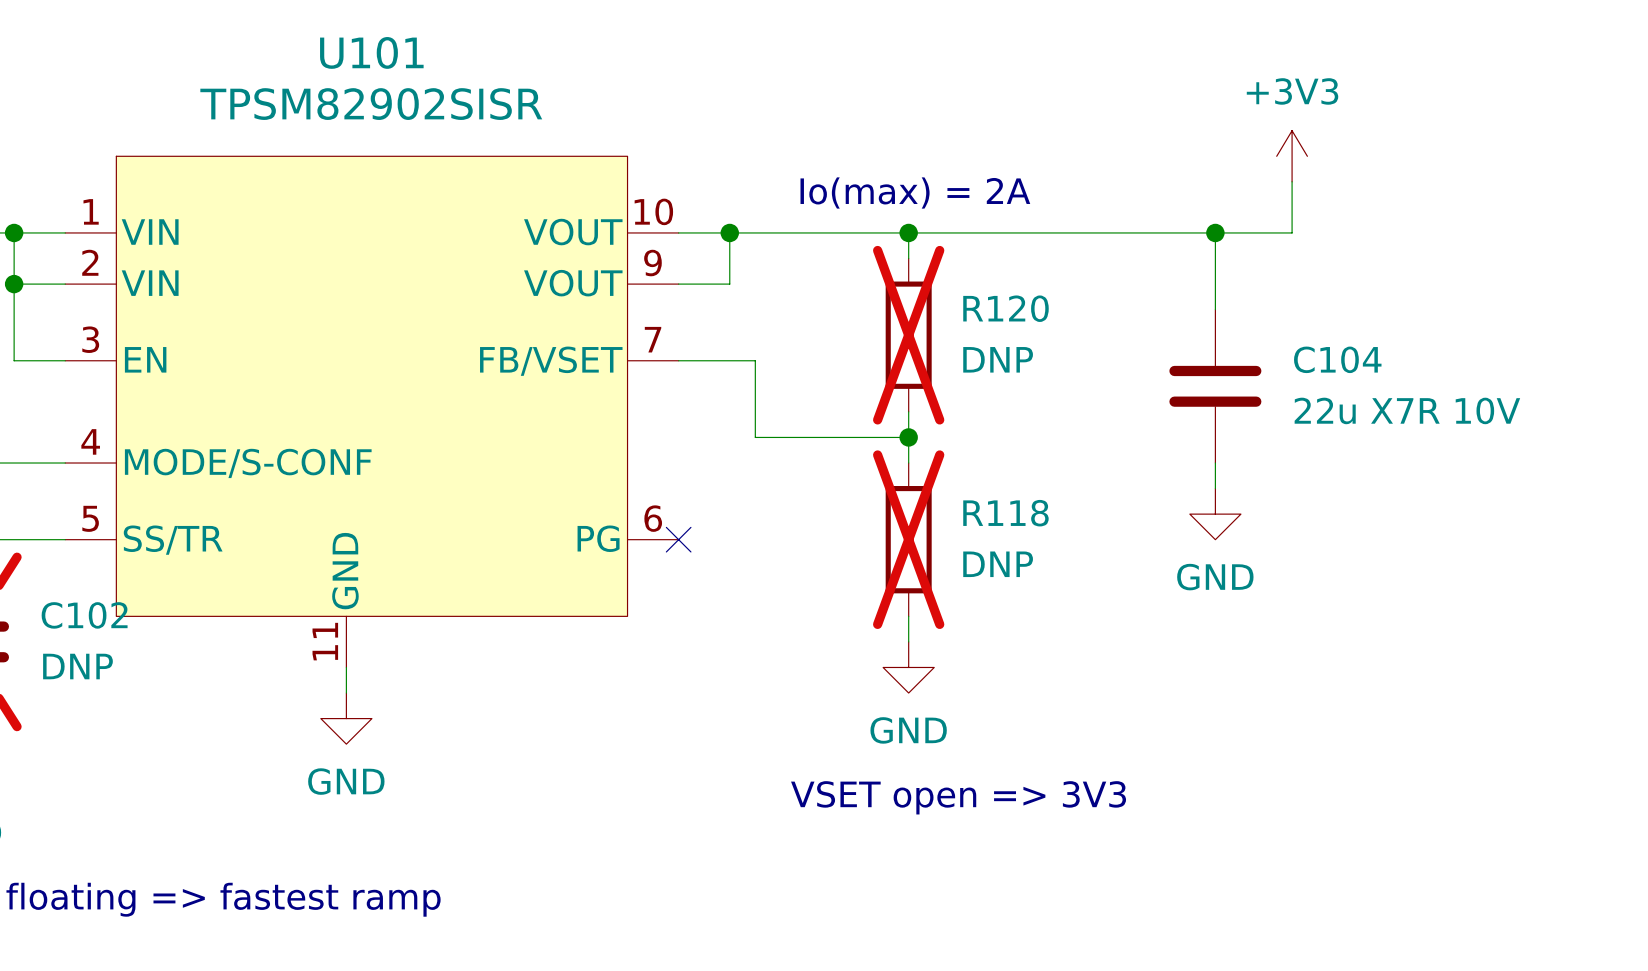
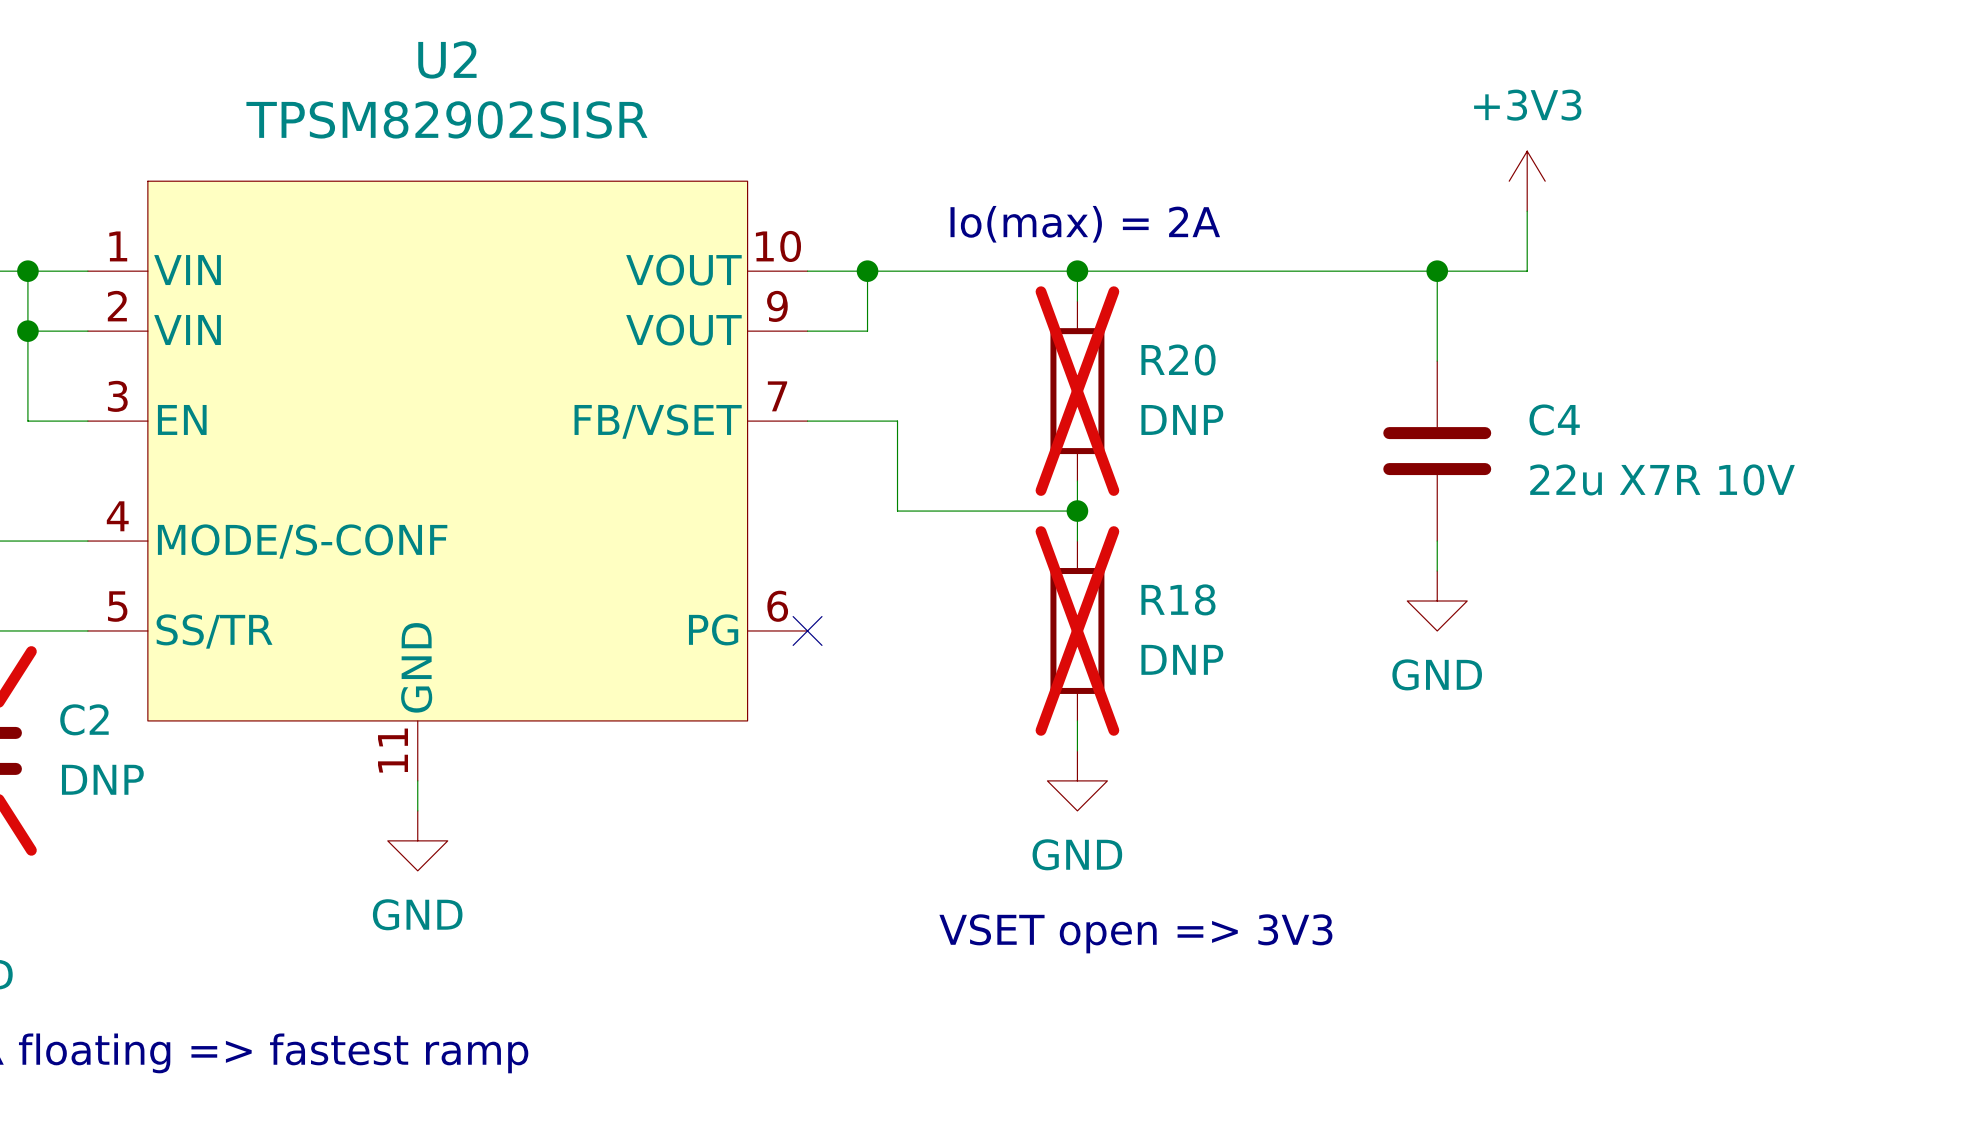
U101 name: U101 (371, 52) -> U2 (447, 59)
R120 name: R120 (1005, 308) -> R20 (1178, 360)
C104 name: C104 (1337, 359) -> C4 (1554, 419)
R118 name: R118 (1005, 513) -> R18 (1178, 599)
C102 name: C102 (84, 615) -> C2 (84, 719)

